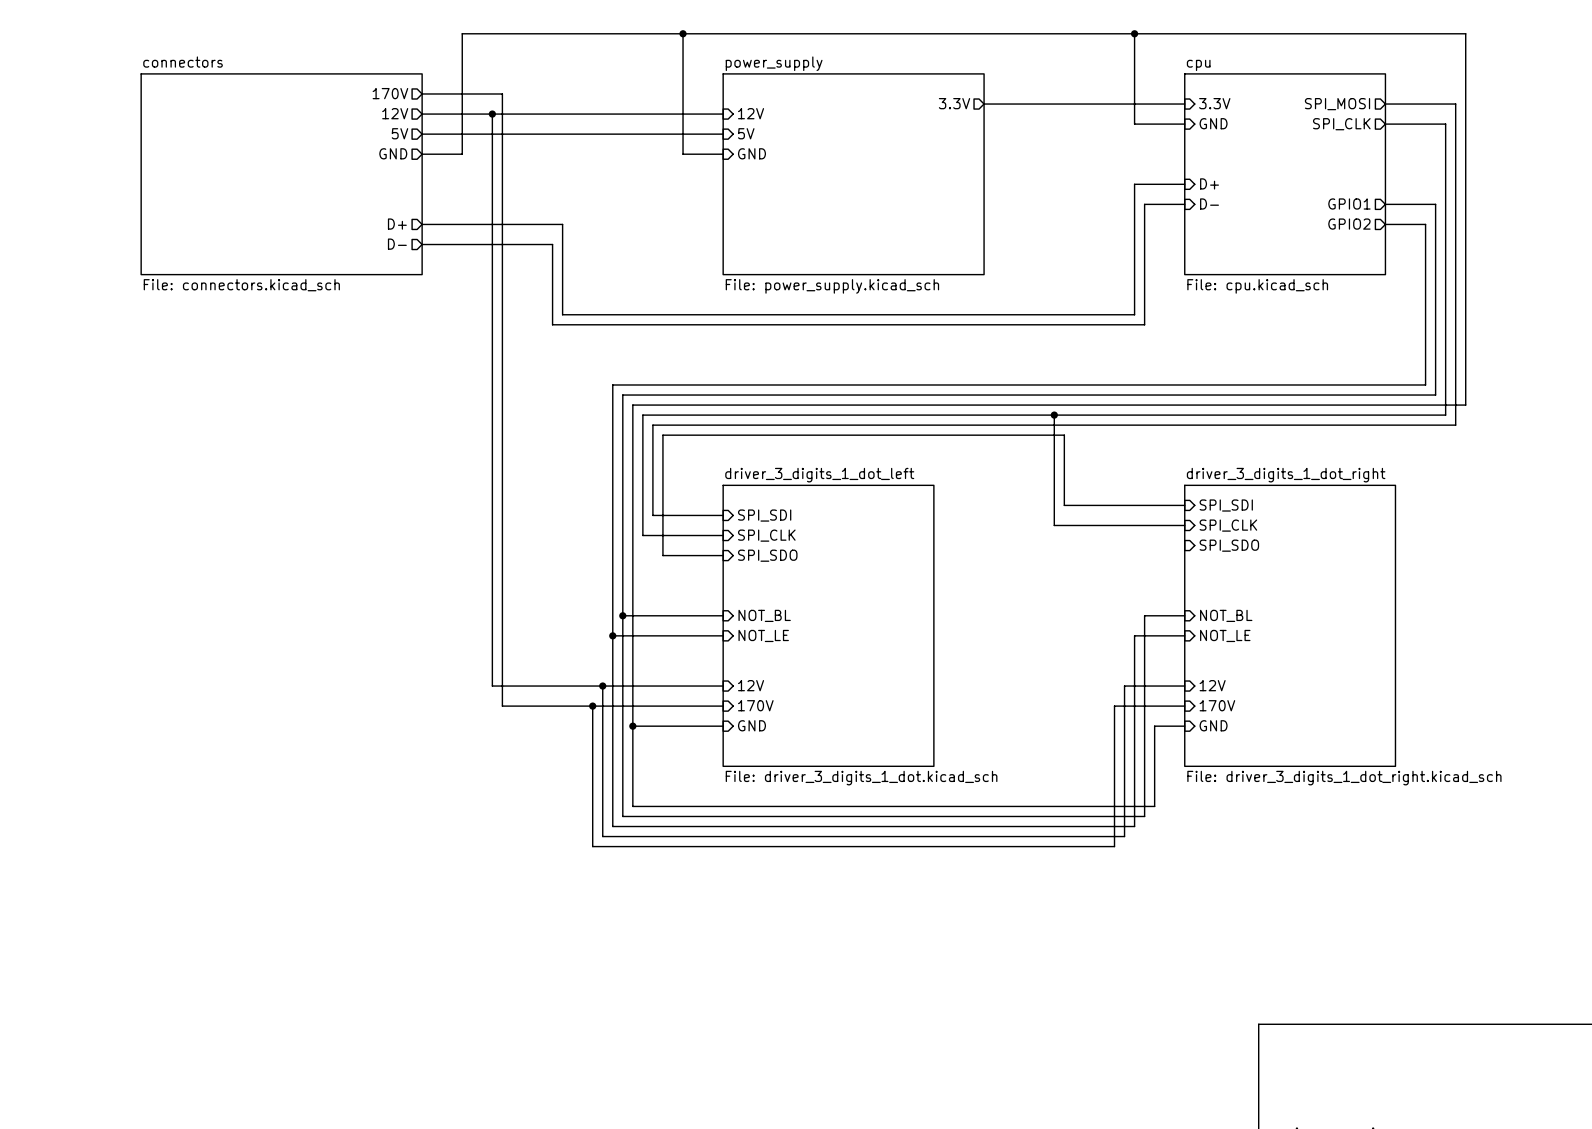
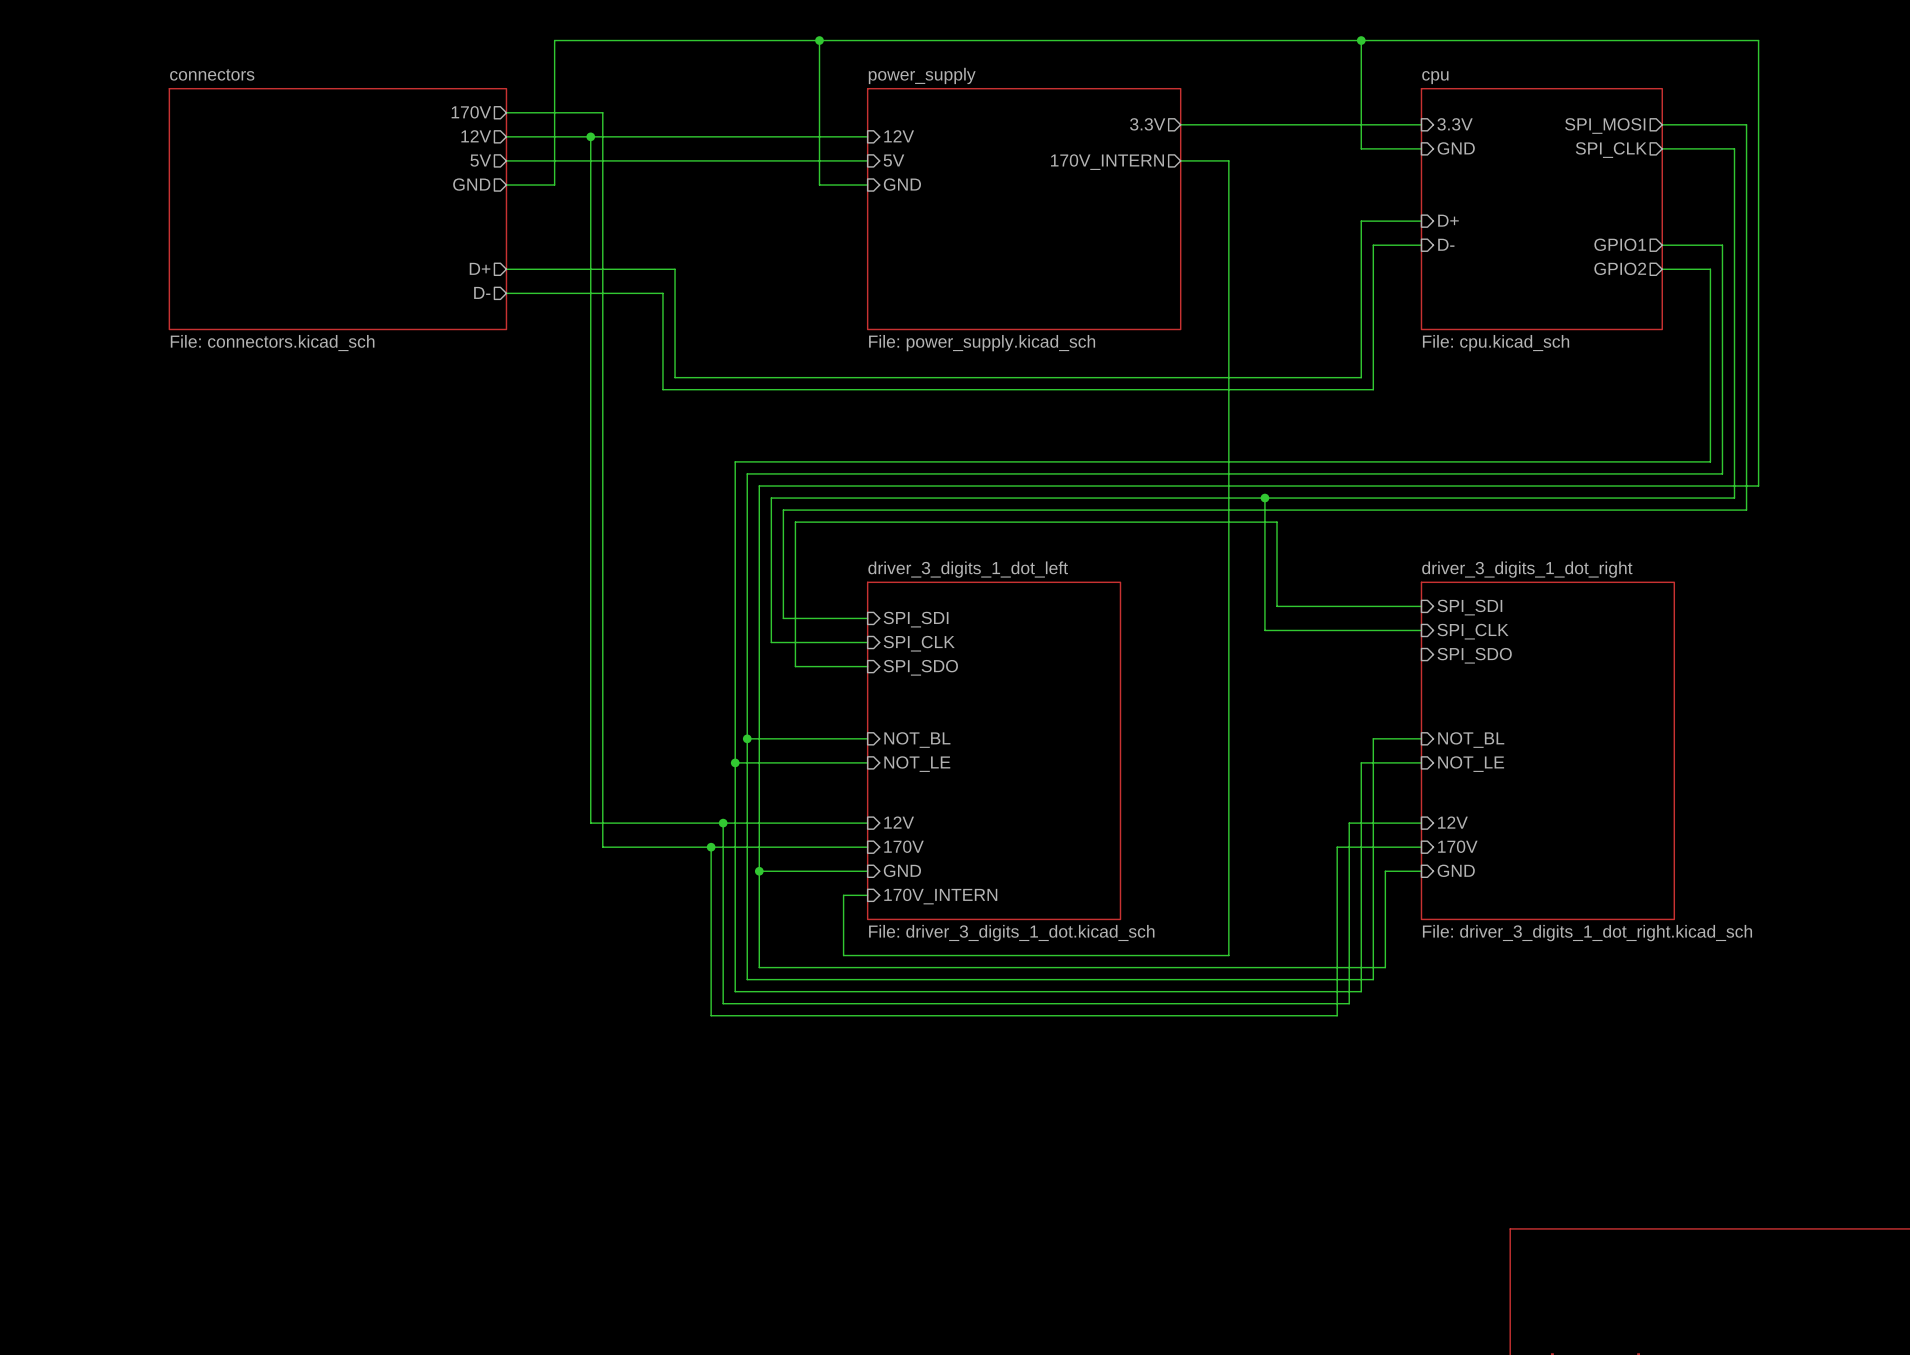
sheet pin: none -> 170V_INTERN (1107, 162)
wire: none -> (1180, 160) (1228, 160) (1228, 955) (843, 955) (843, 895) (867, 895)
sheet pin: none -> 170V_INTERN (940, 896)

